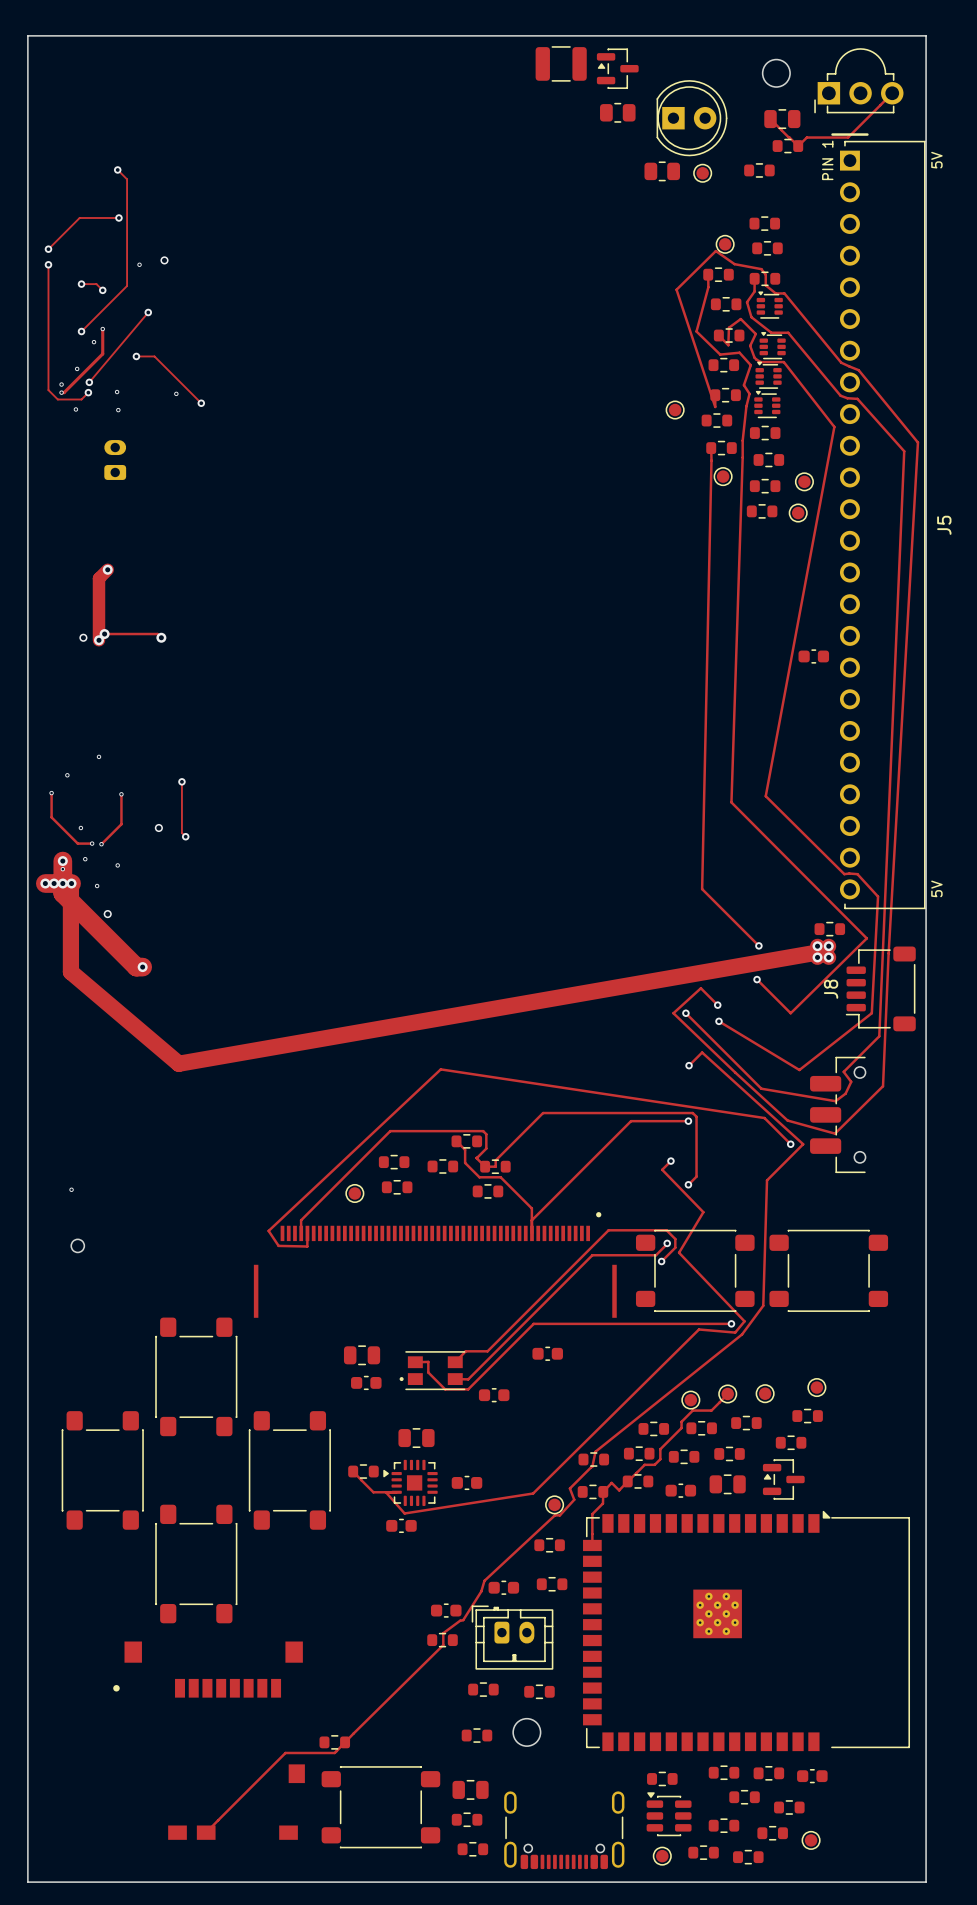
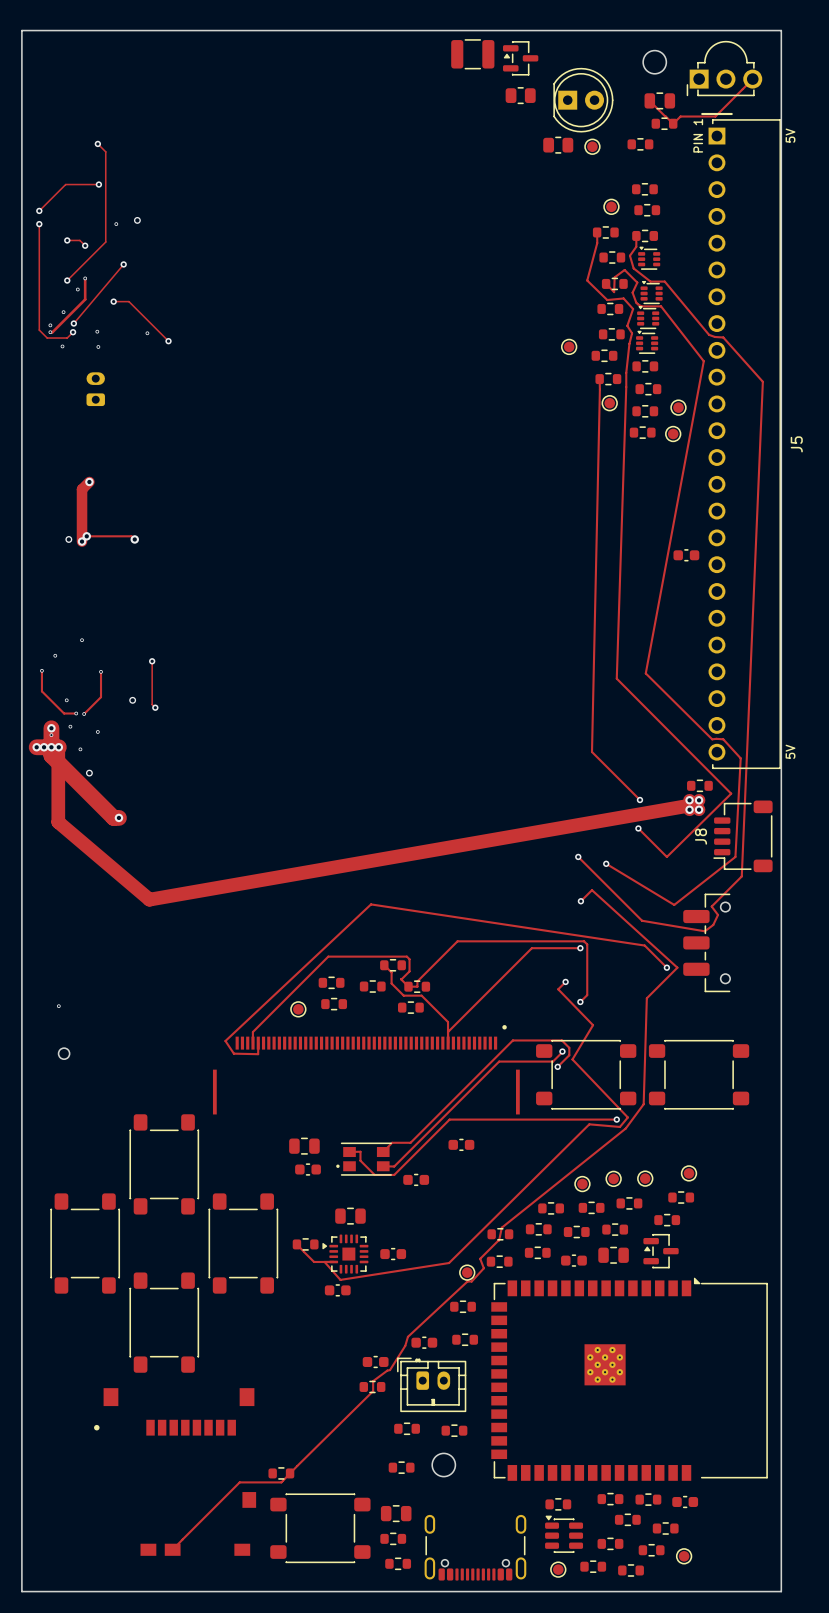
track: (715, 395) (715, 406) (676, 289) (715, 251) (734, 264) (761, 269) (765, 274) (765, 285) (775, 293) (784, 293) (841, 362) (858, 370) (917, 442) (888, 953) (883, 1086) (835, 1133) (787, 1120) (673, 1013) (700, 988) (717, 1005) -> none
via: (717, 1005) -> none
track: (727, 1393) (711, 1410) (692, 1410) (681, 1421) (681, 1428) (660, 1449) (660, 1459) (654, 1464) (644, 1464) (619, 1490) (611, 1482) (603, 1491) (602, 1503) (592, 1514) (592, 1545) -> none

